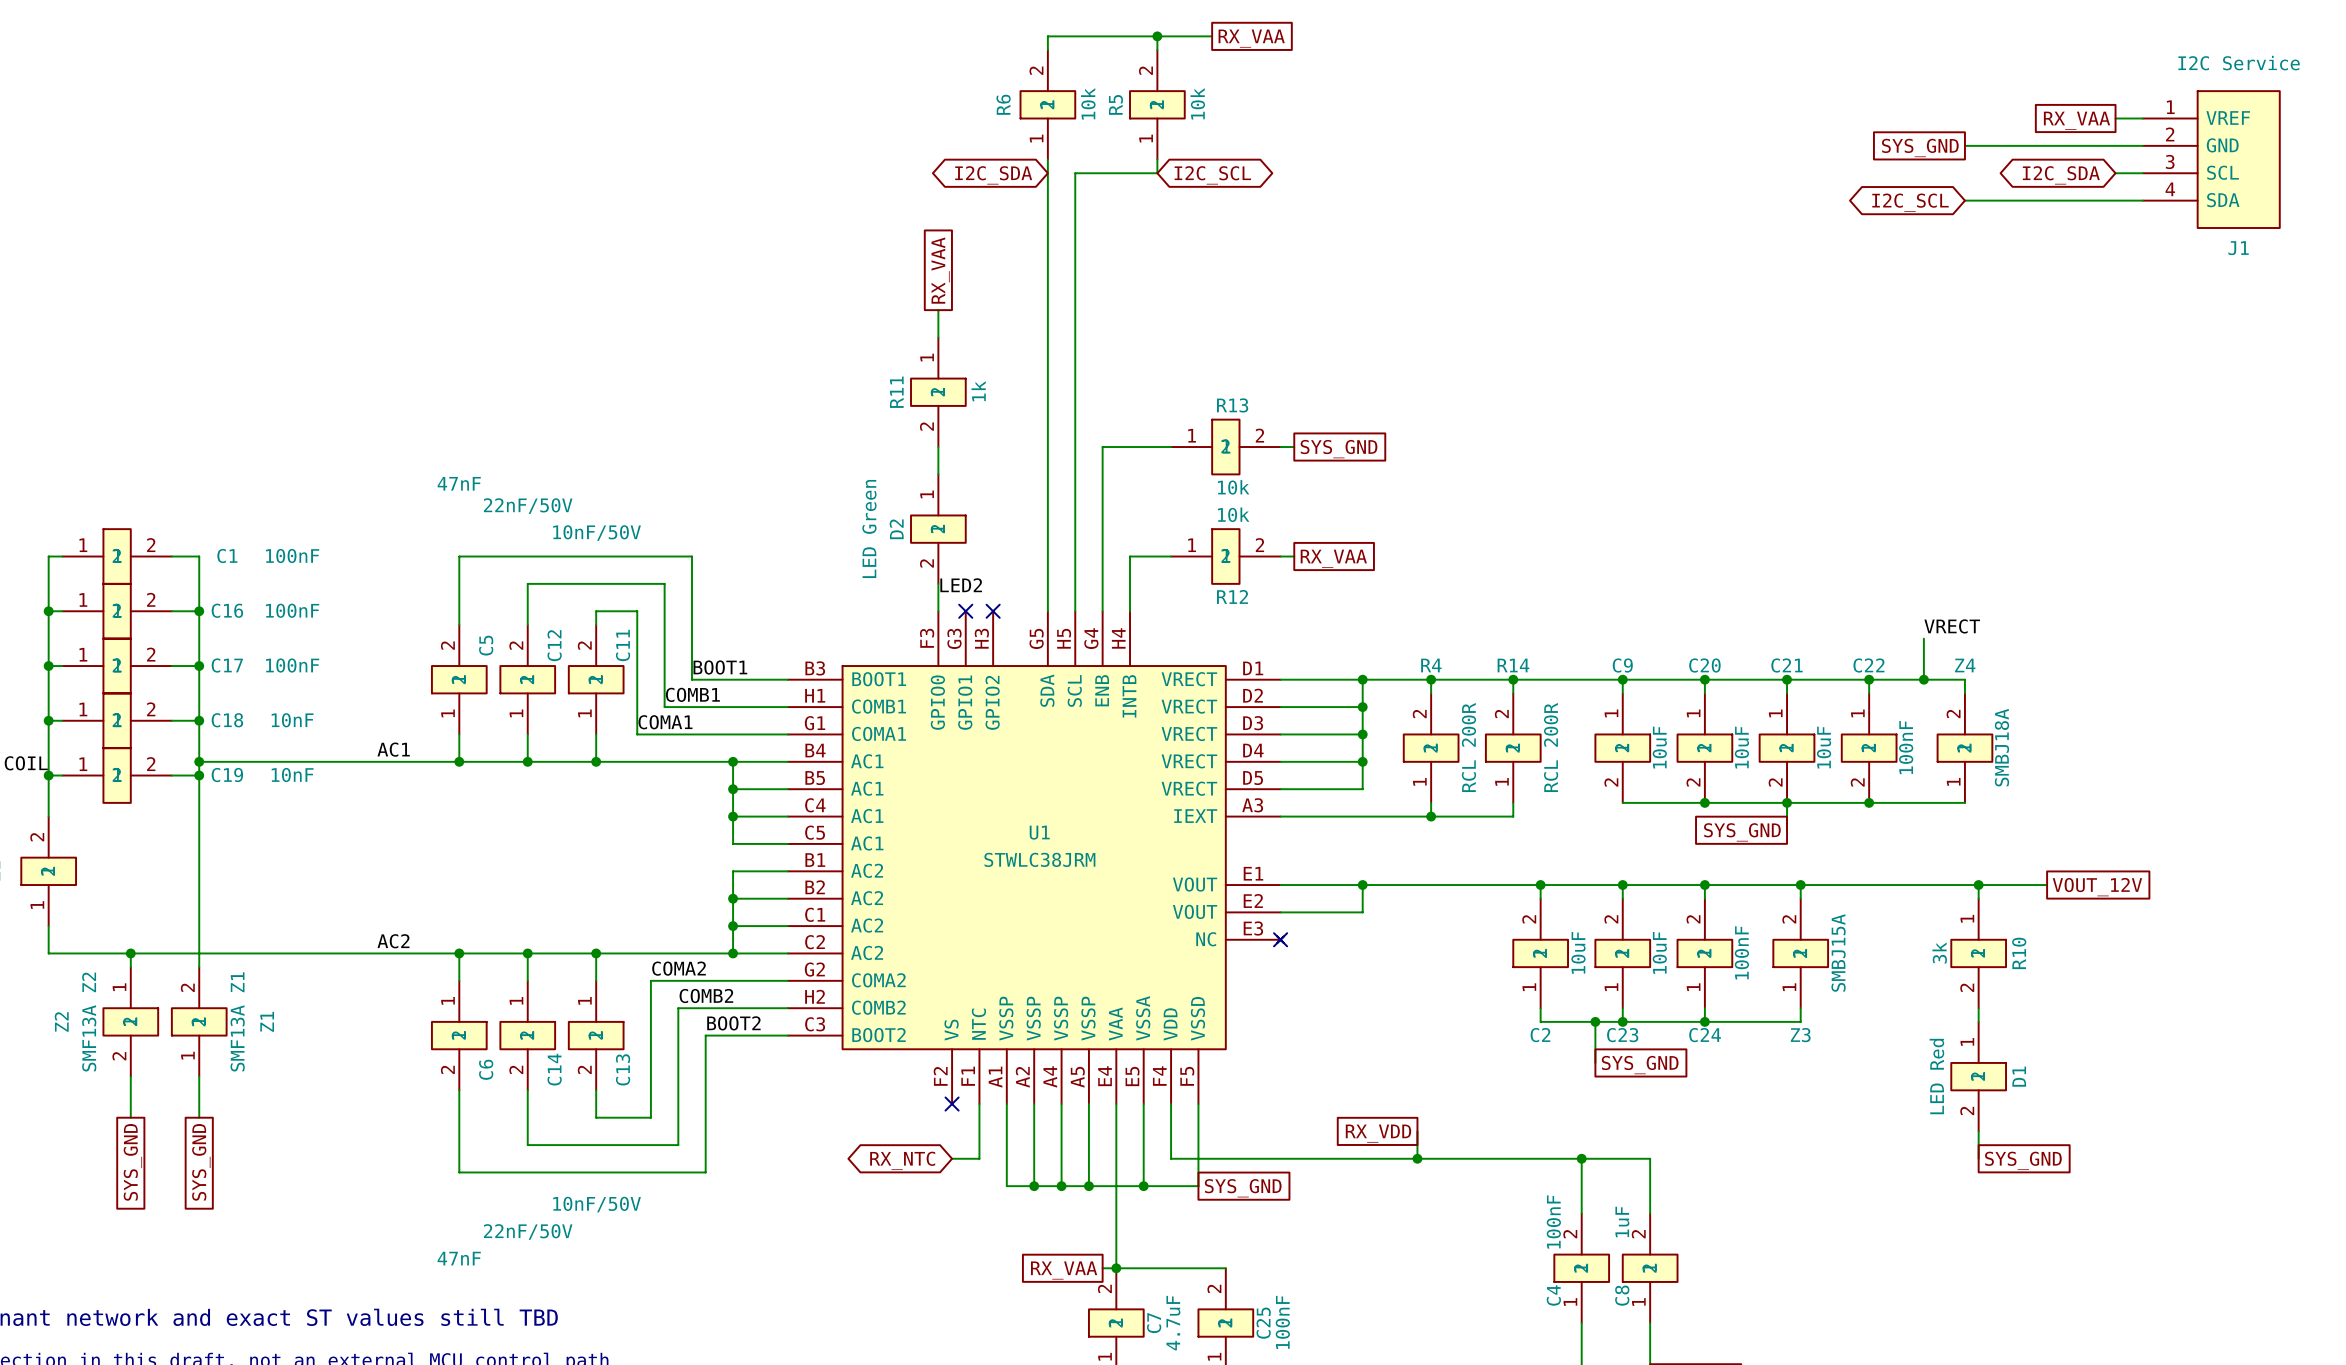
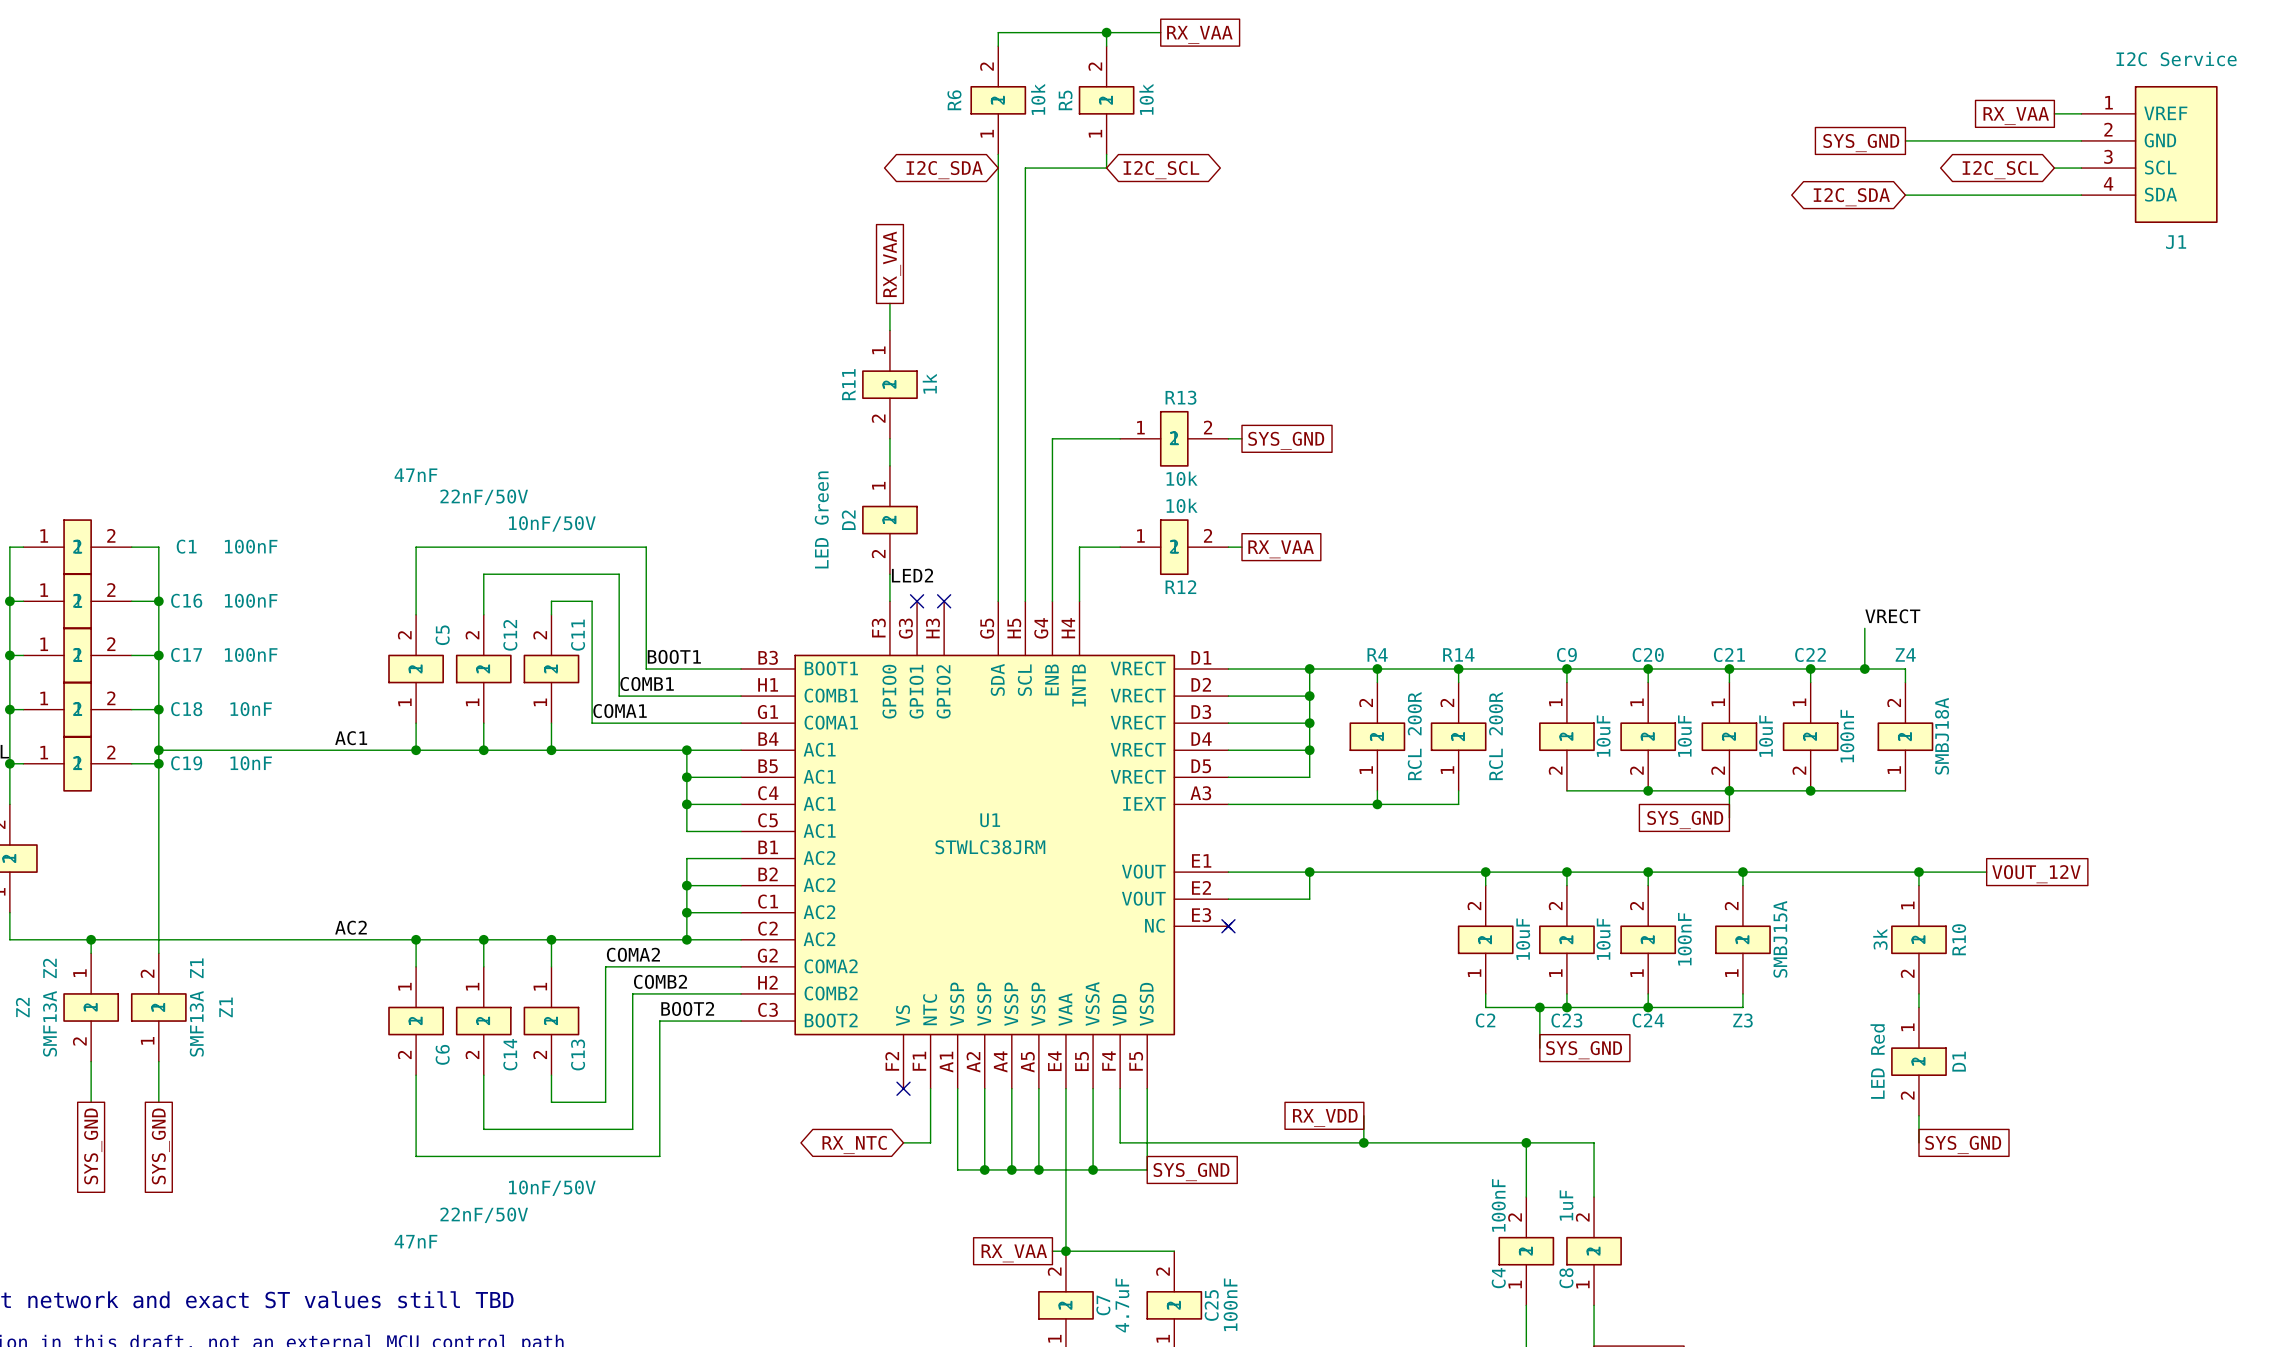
global label: I2C_SDA (2061, 175) -> I2C_SCL (2000, 170)
global label: I2C_SCL (1910, 202) -> I2C_SDA (1851, 197)

